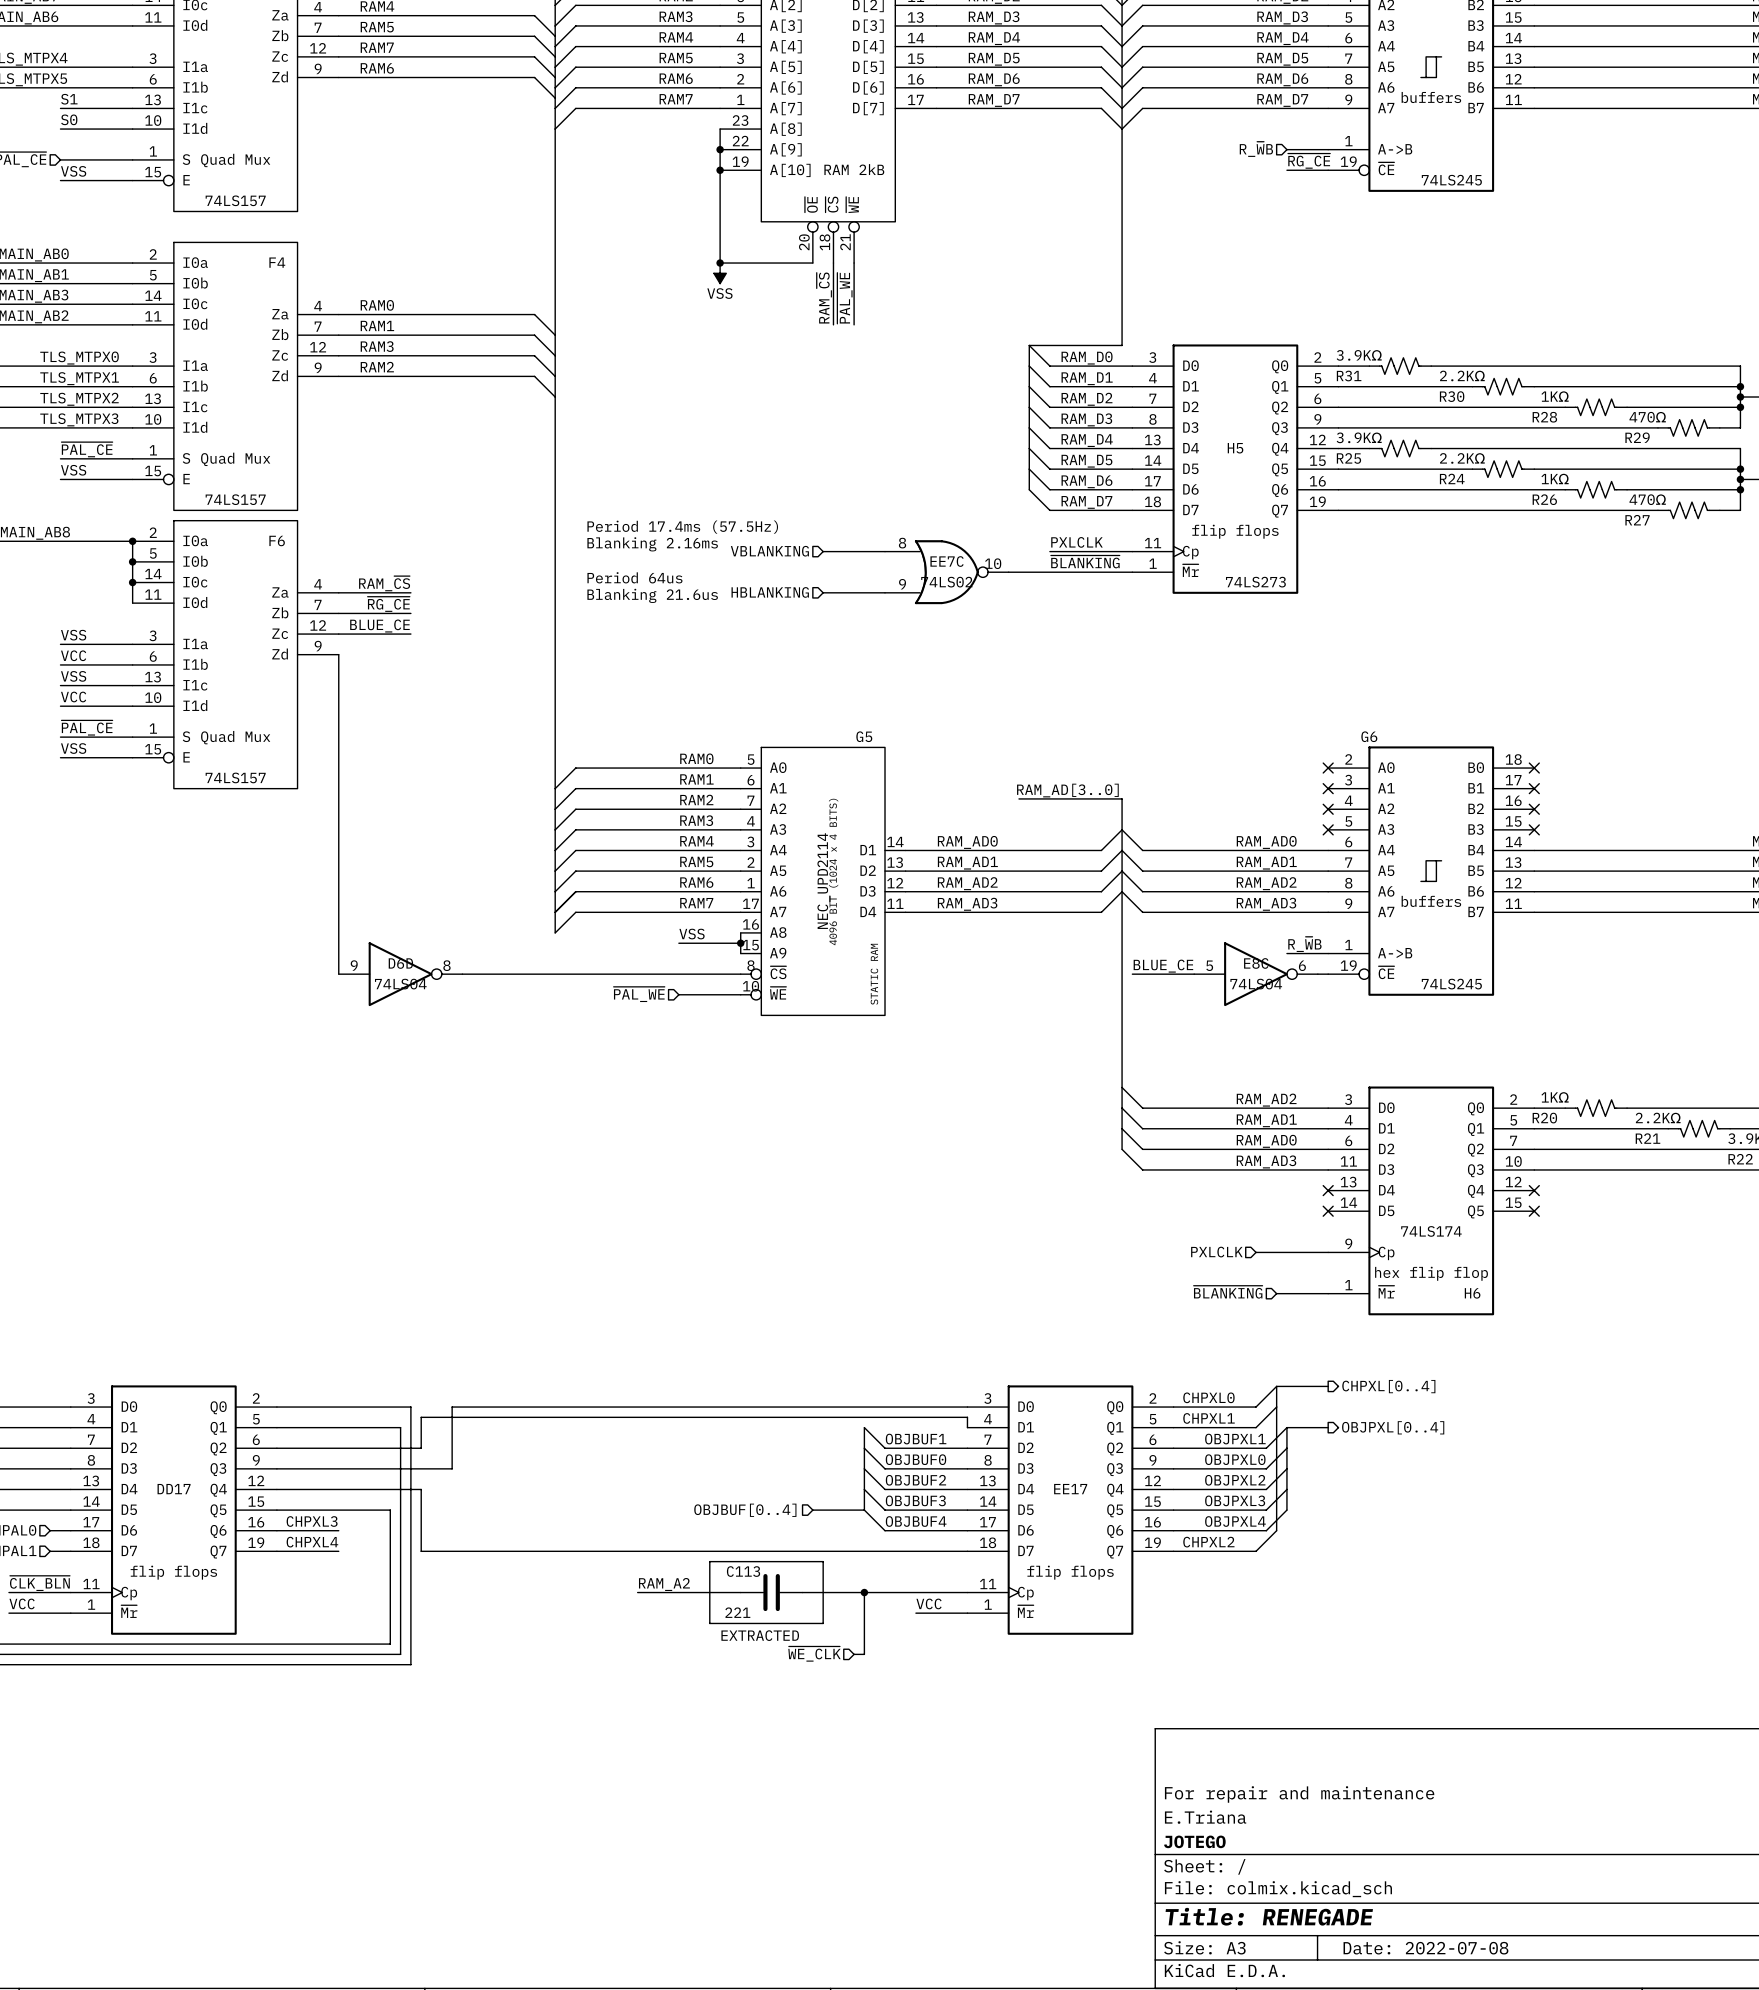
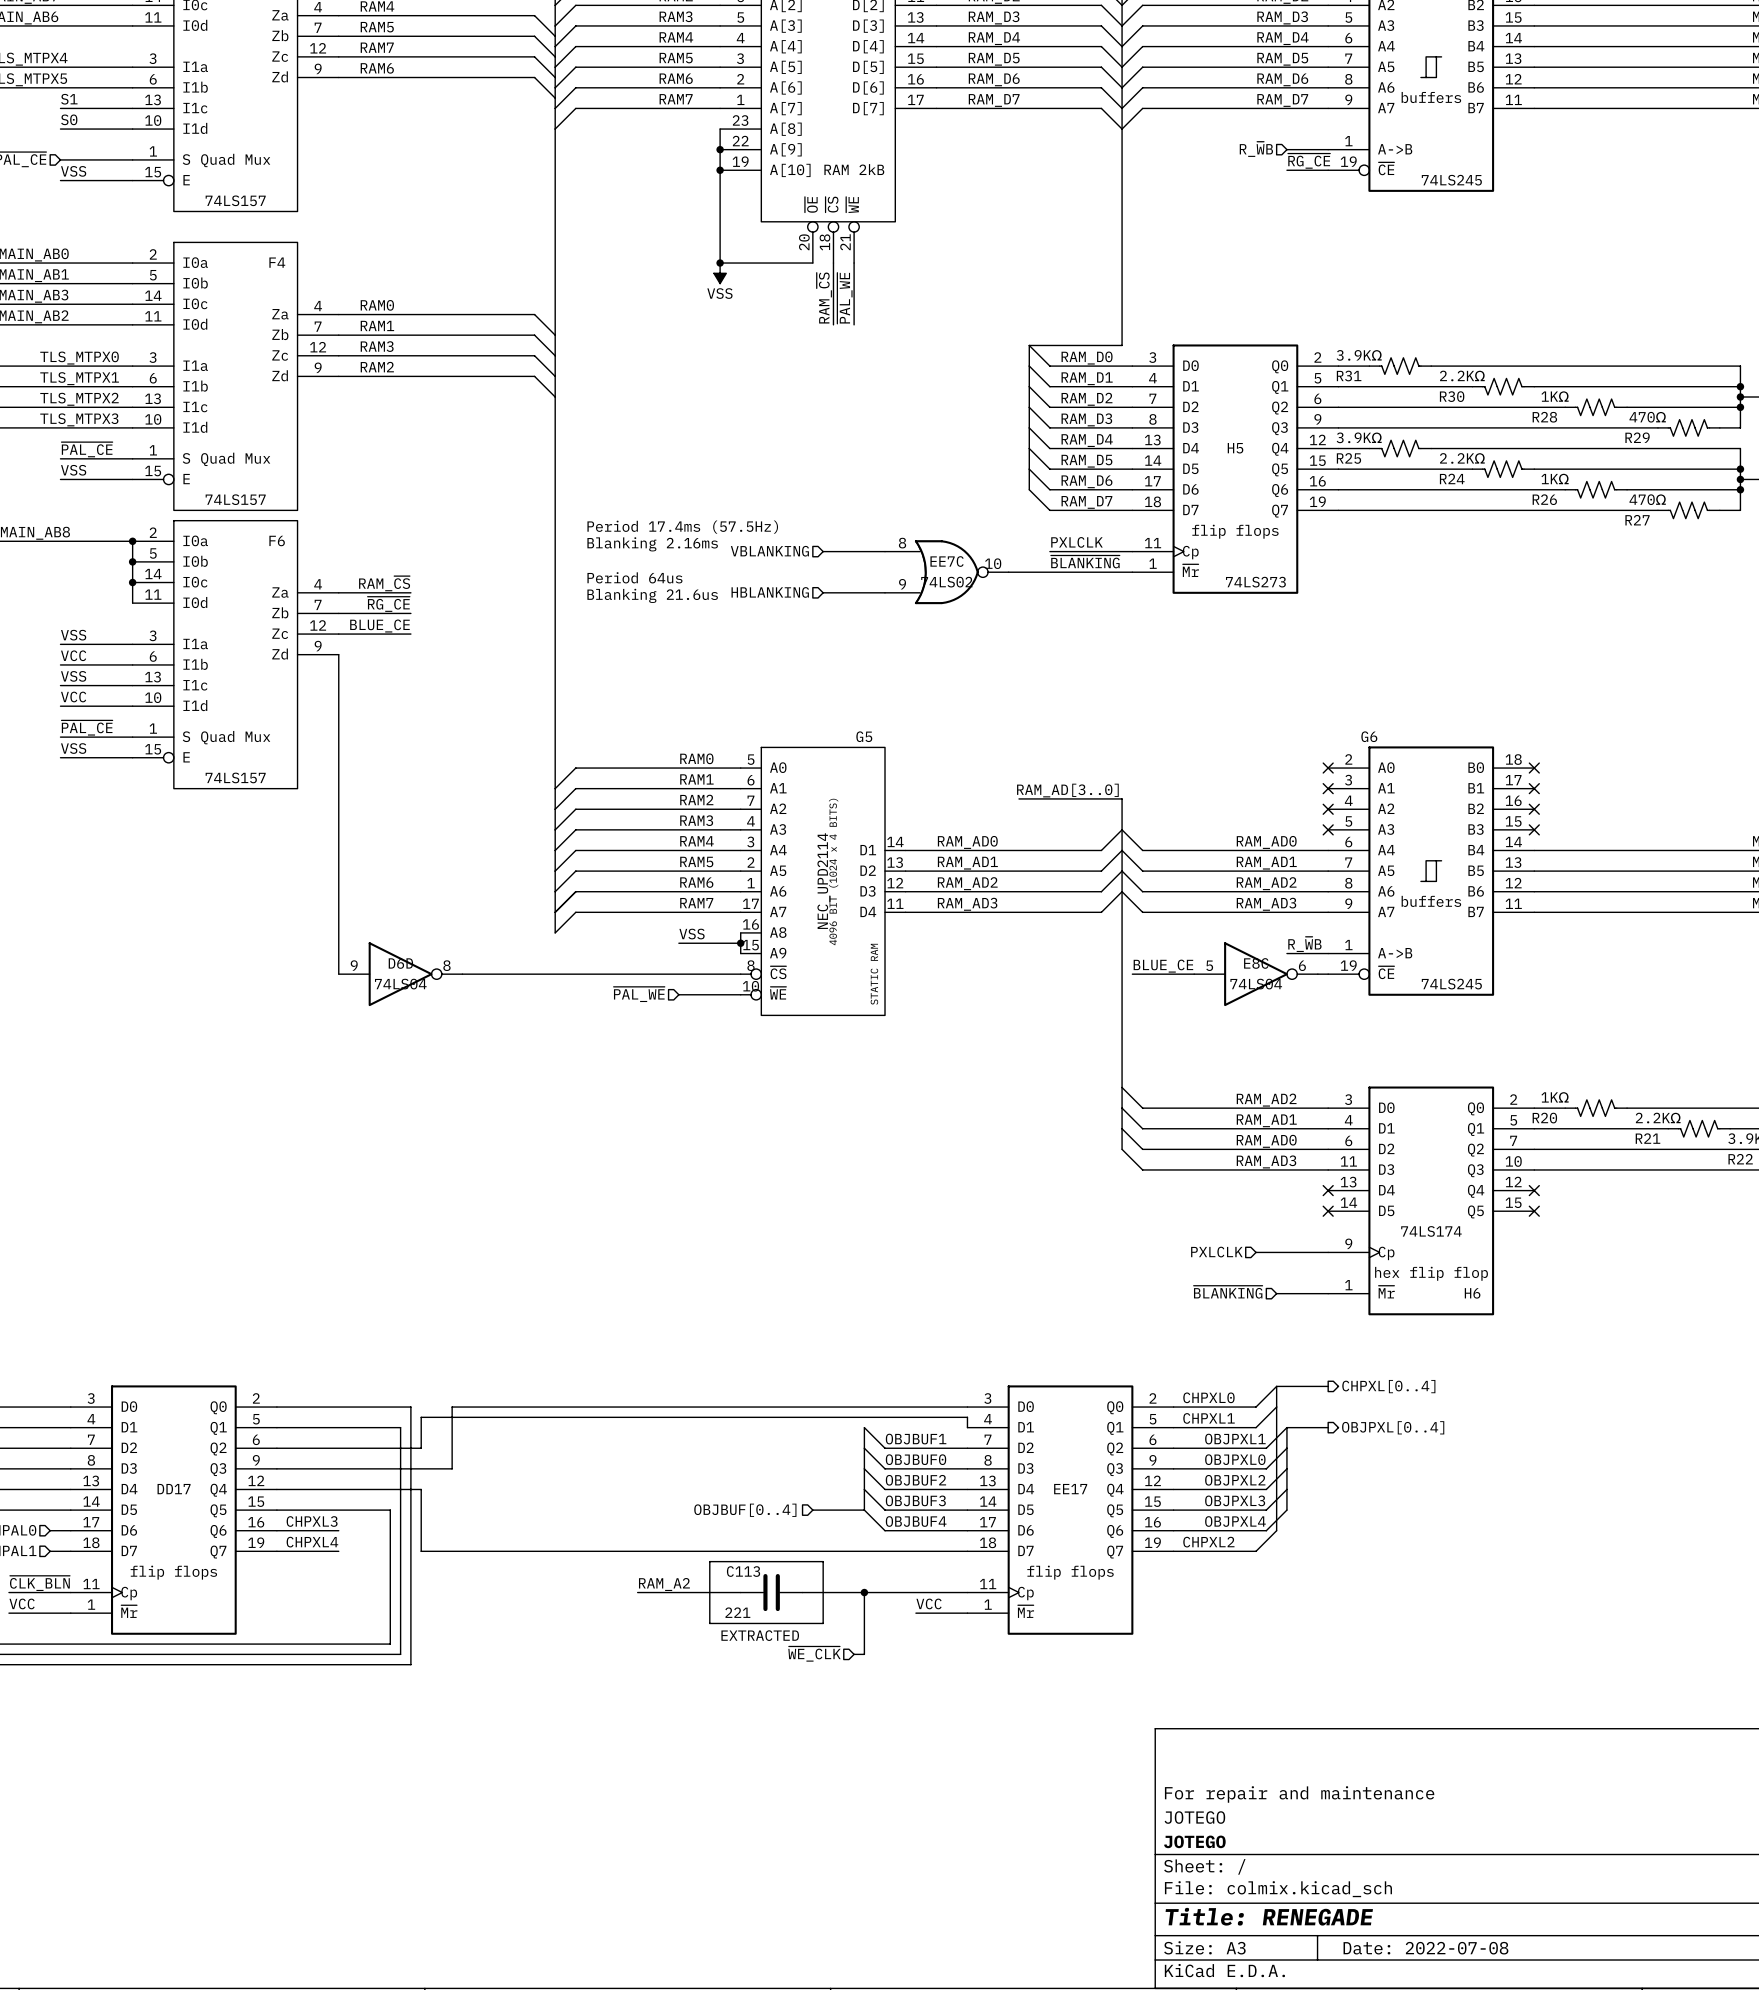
title block: E.Triana (1205, 1817) -> JOTEGO (1194, 1817)

